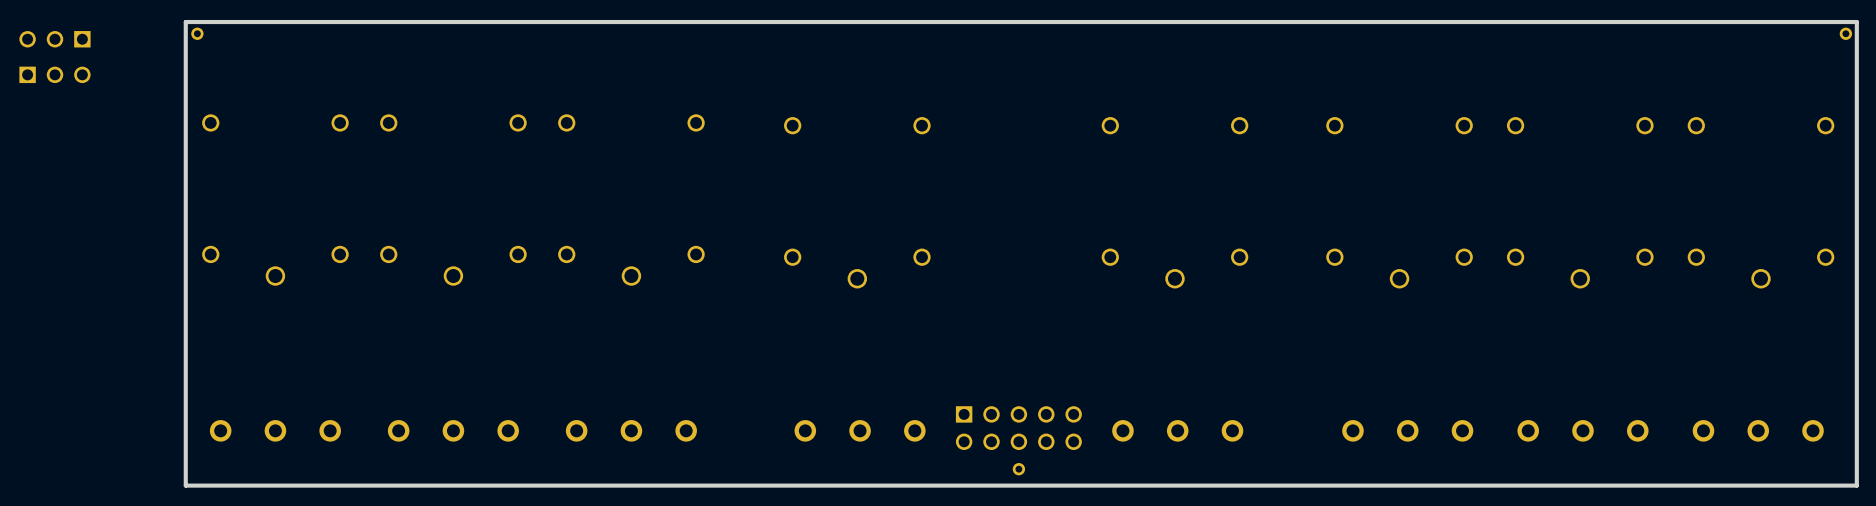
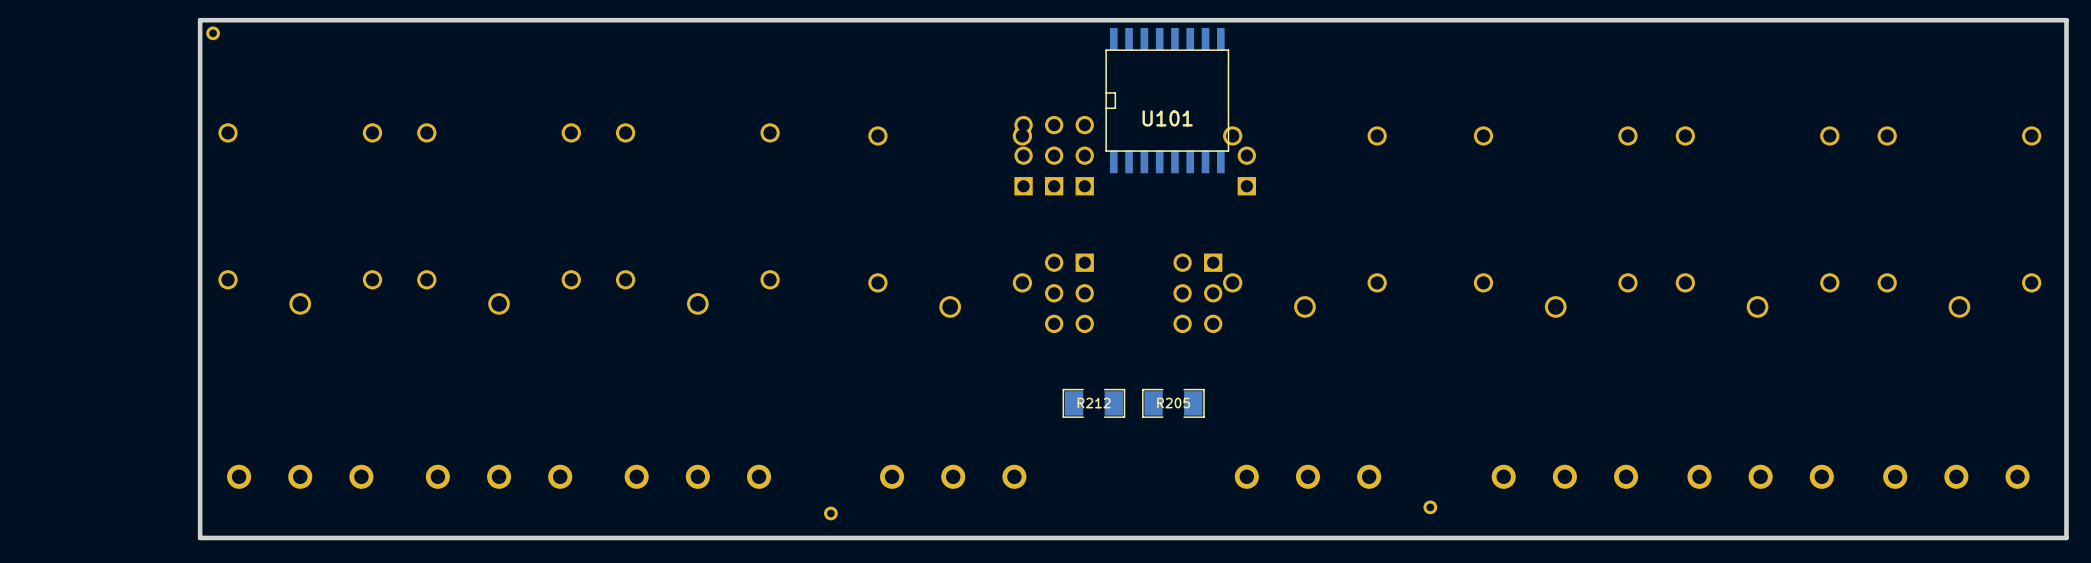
part: (1845, 33) -> none
part: (54, 39) -> none
part: (54, 74) -> none
U101: none -> (1167, 100)
part: none -> (1023, 155)
part: none -> (1054, 155)
part: none -> (1084, 155)
part: none -> (1246, 170)
part: none -> (1069, 293)
part: none -> (1197, 293)
R212: none -> (1093, 403)
R205: none -> (1173, 403)
part: (1018, 428) -> none
part: none -> (1430, 507)
part: none -> (830, 513)
part: (1018, 469) -> none

